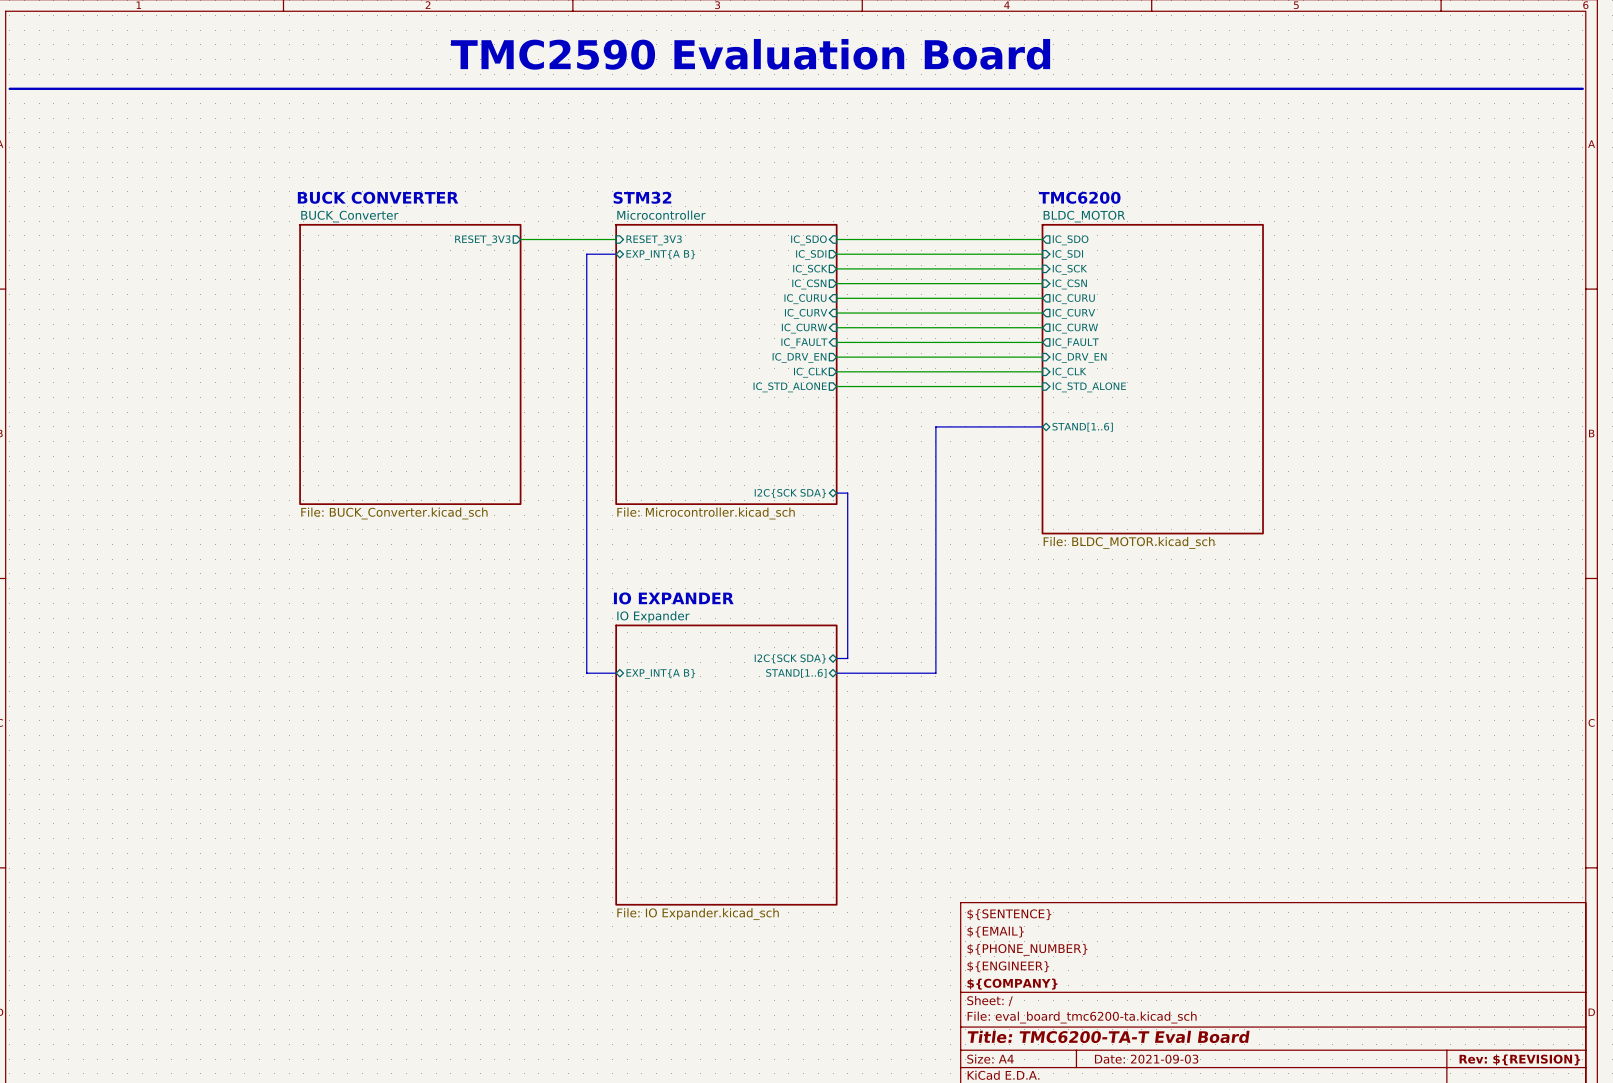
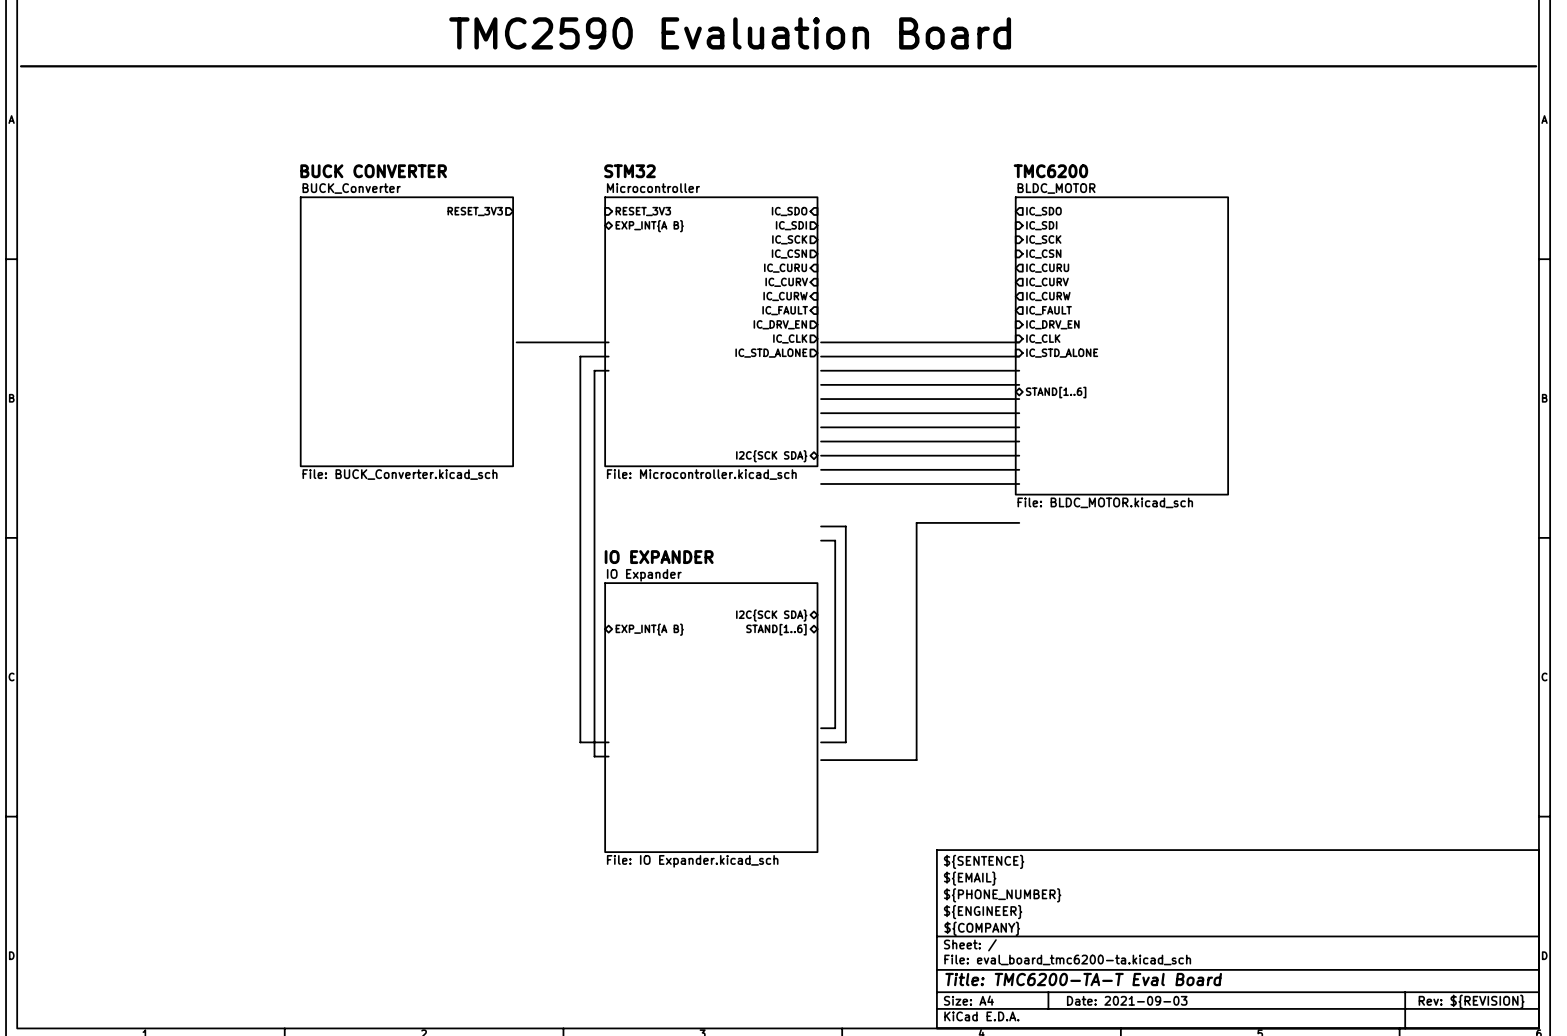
wire: (520, 239) (616, 239) -> (516, 342) (608, 342)
wire: (836, 239) (1042, 239) -> (821, 342) (1019, 342)
bus: (616, 254) (586, 254) (586, 673) (616, 673) -> none
wire: (836, 254) (1042, 254) -> (821, 356) (1019, 356)
wire: (836, 268) (1042, 268) -> (821, 370) (1019, 370)
wire: (836, 283) (1042, 283) -> (821, 384) (1019, 384)
wire: (836, 298) (1042, 298) -> (821, 399) (1019, 399)
wire: (836, 313) (1042, 313) -> (821, 413) (1019, 413)
wire: (836, 327) (1042, 327) -> (821, 427) (1019, 427)
wire: (836, 342) (1042, 342) -> (821, 441) (1019, 441)
wire: (836, 357) (1042, 357) -> (821, 455) (1019, 455)
wire: (836, 371) (1042, 371) -> (821, 469) (1019, 469)
wire: (836, 386) (1042, 386) -> (821, 483) (1019, 483)
wire: none -> (608, 356) (580, 356) (580, 742) (608, 742)
wire: none -> (608, 370) (594, 370) (594, 756) (608, 756)
bus: (1042, 426) (935, 426) (935, 673) (836, 673) -> (1019, 522) (916, 522) (916, 760) (821, 760)
bus: (836, 493) (847, 493) (847, 658) (836, 658) -> none
wire: none -> (821, 526) (845, 526) (845, 742) (821, 742)
wire: none -> (821, 540) (835, 540) (835, 728) (821, 728)

